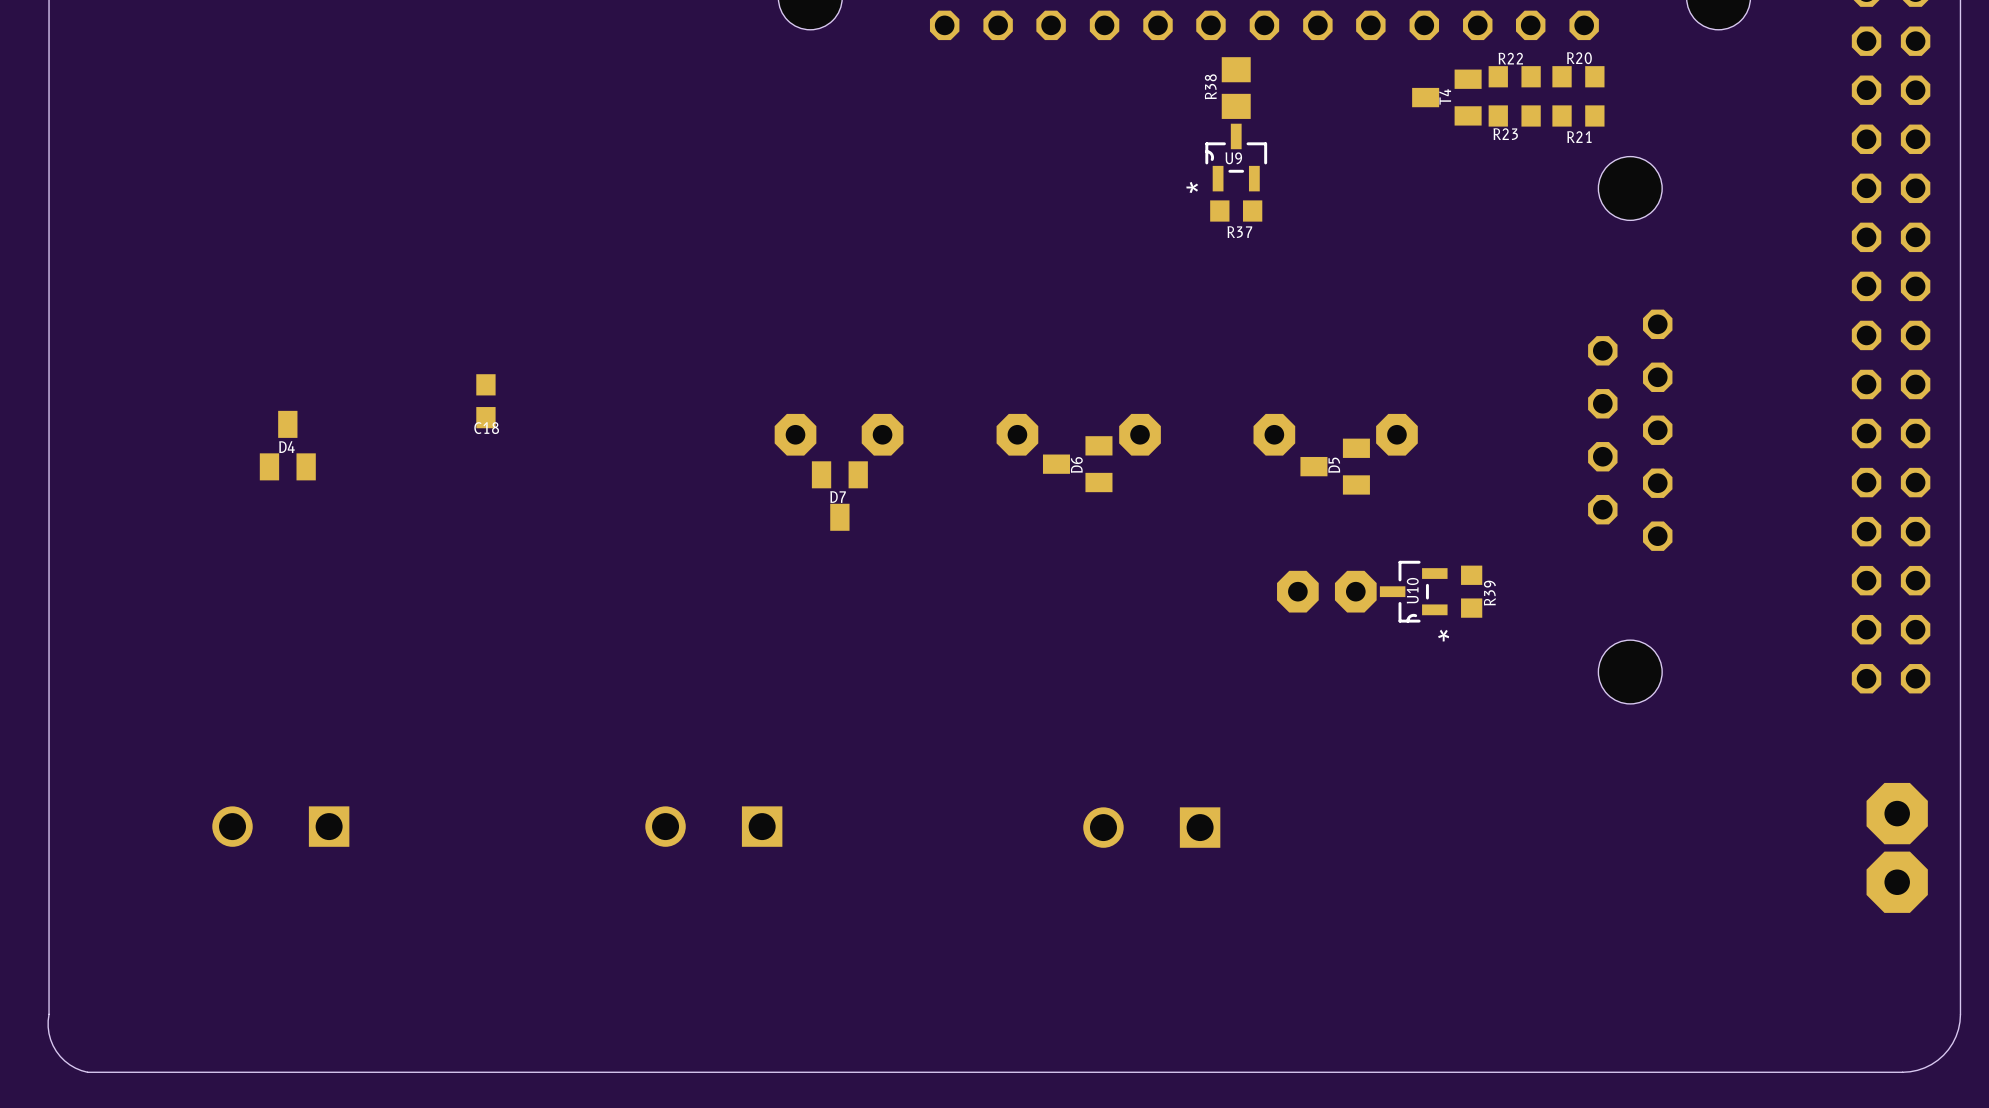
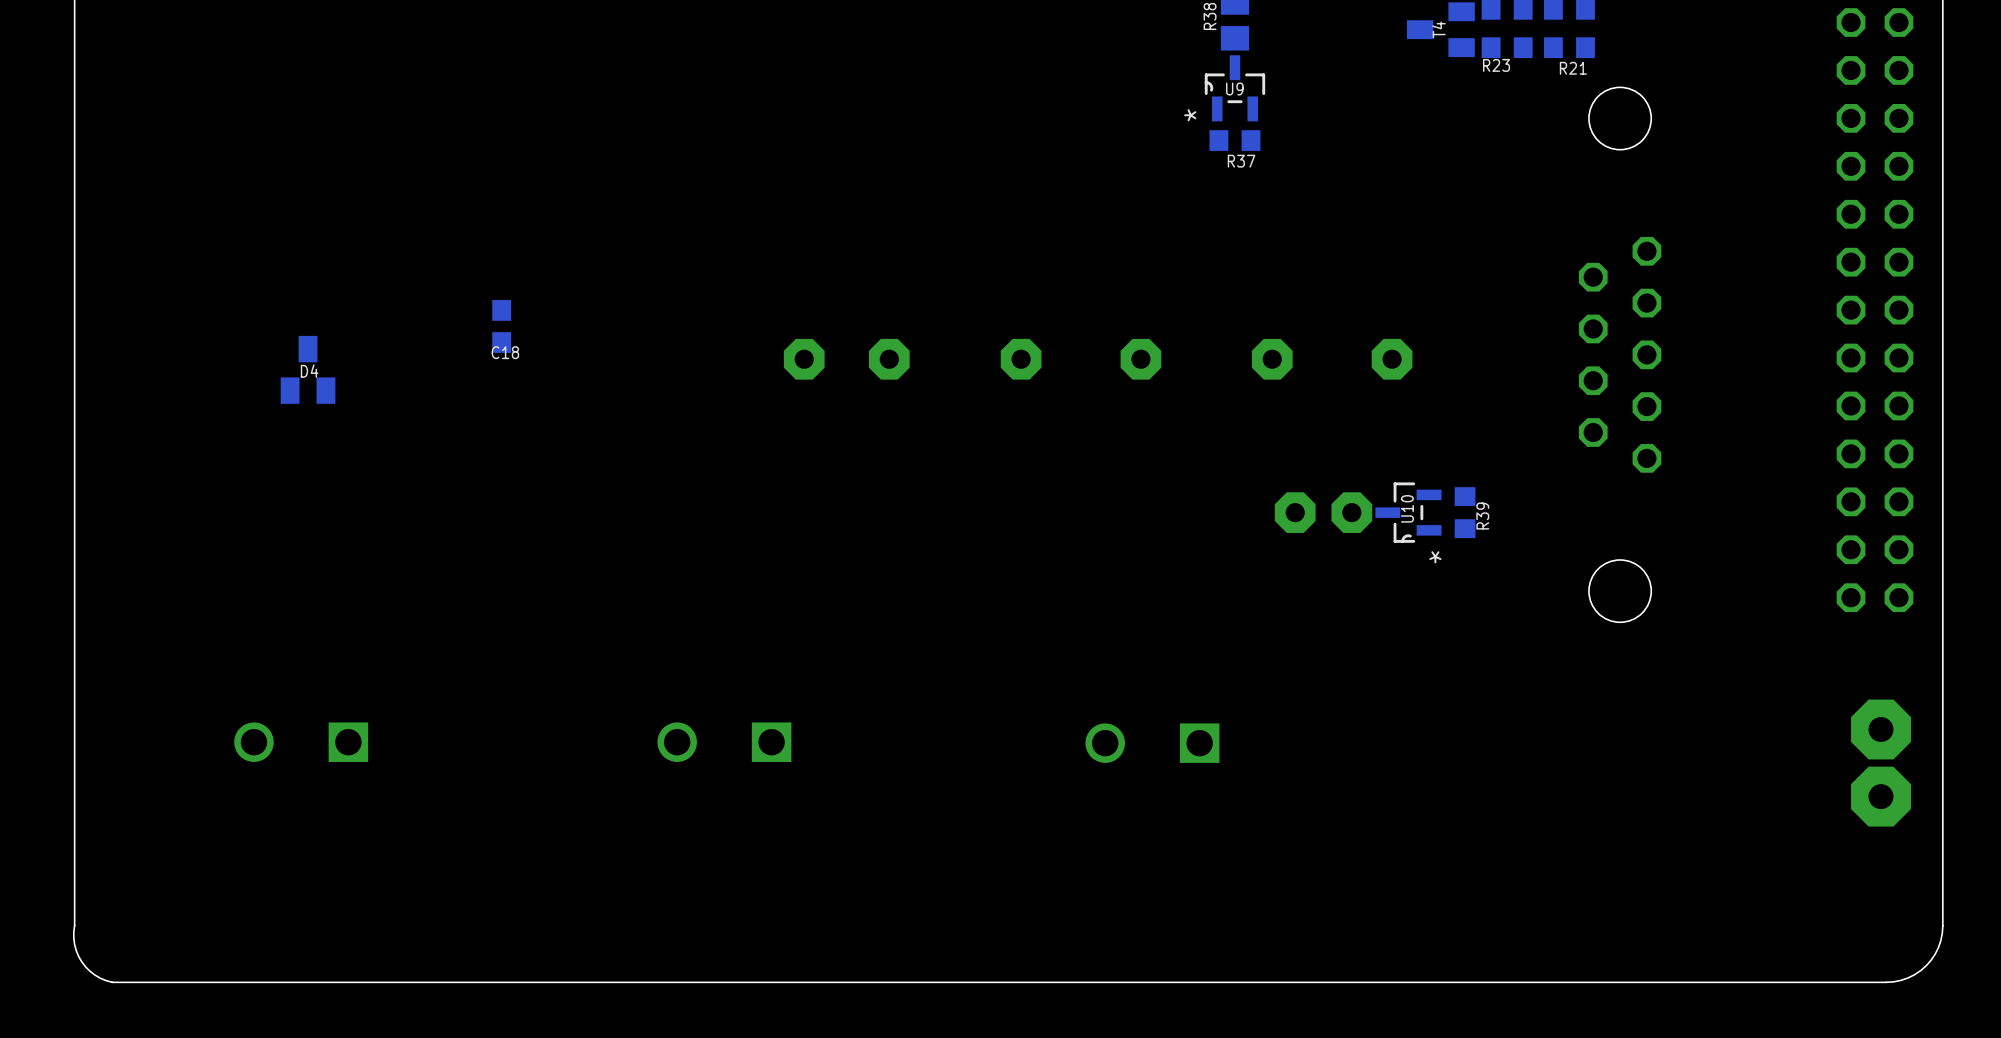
D6: (1077, 464) -> none
D5: (1335, 466) -> none
D7: (839, 496) -> none

